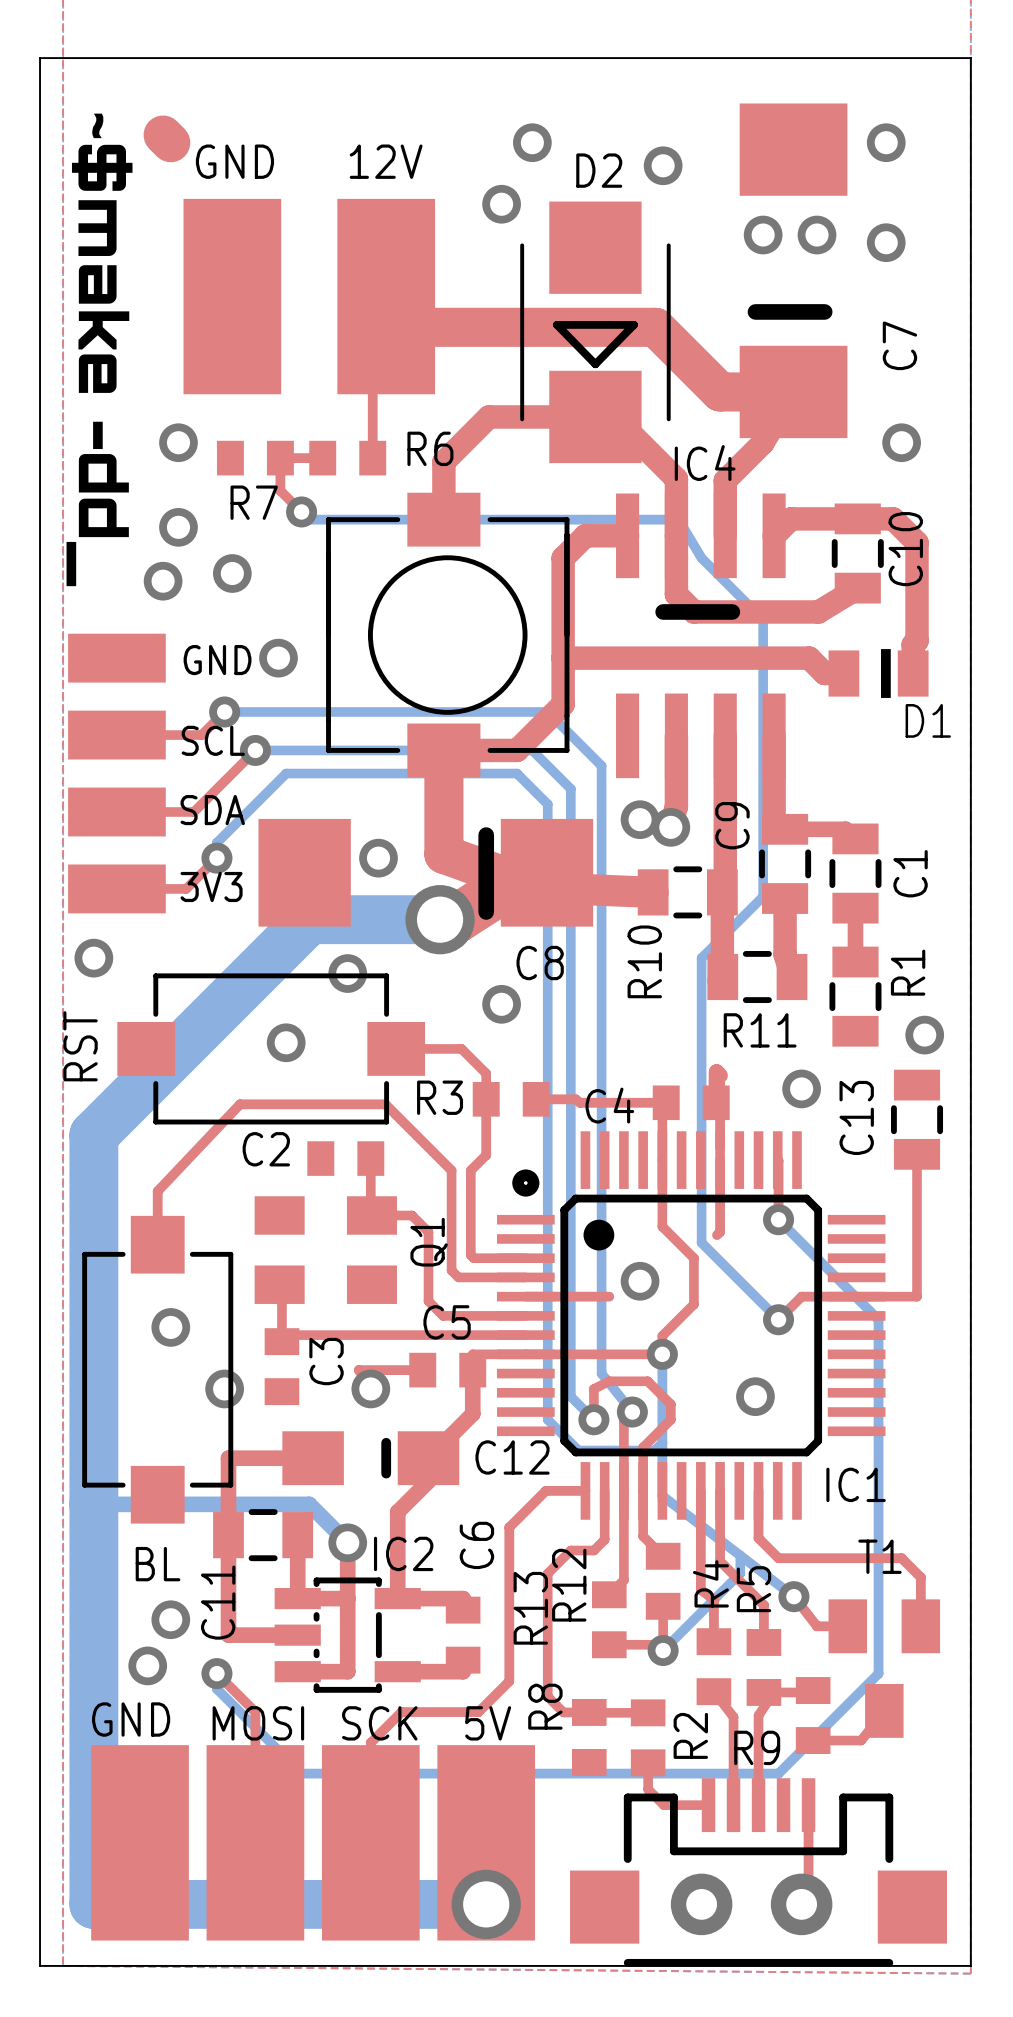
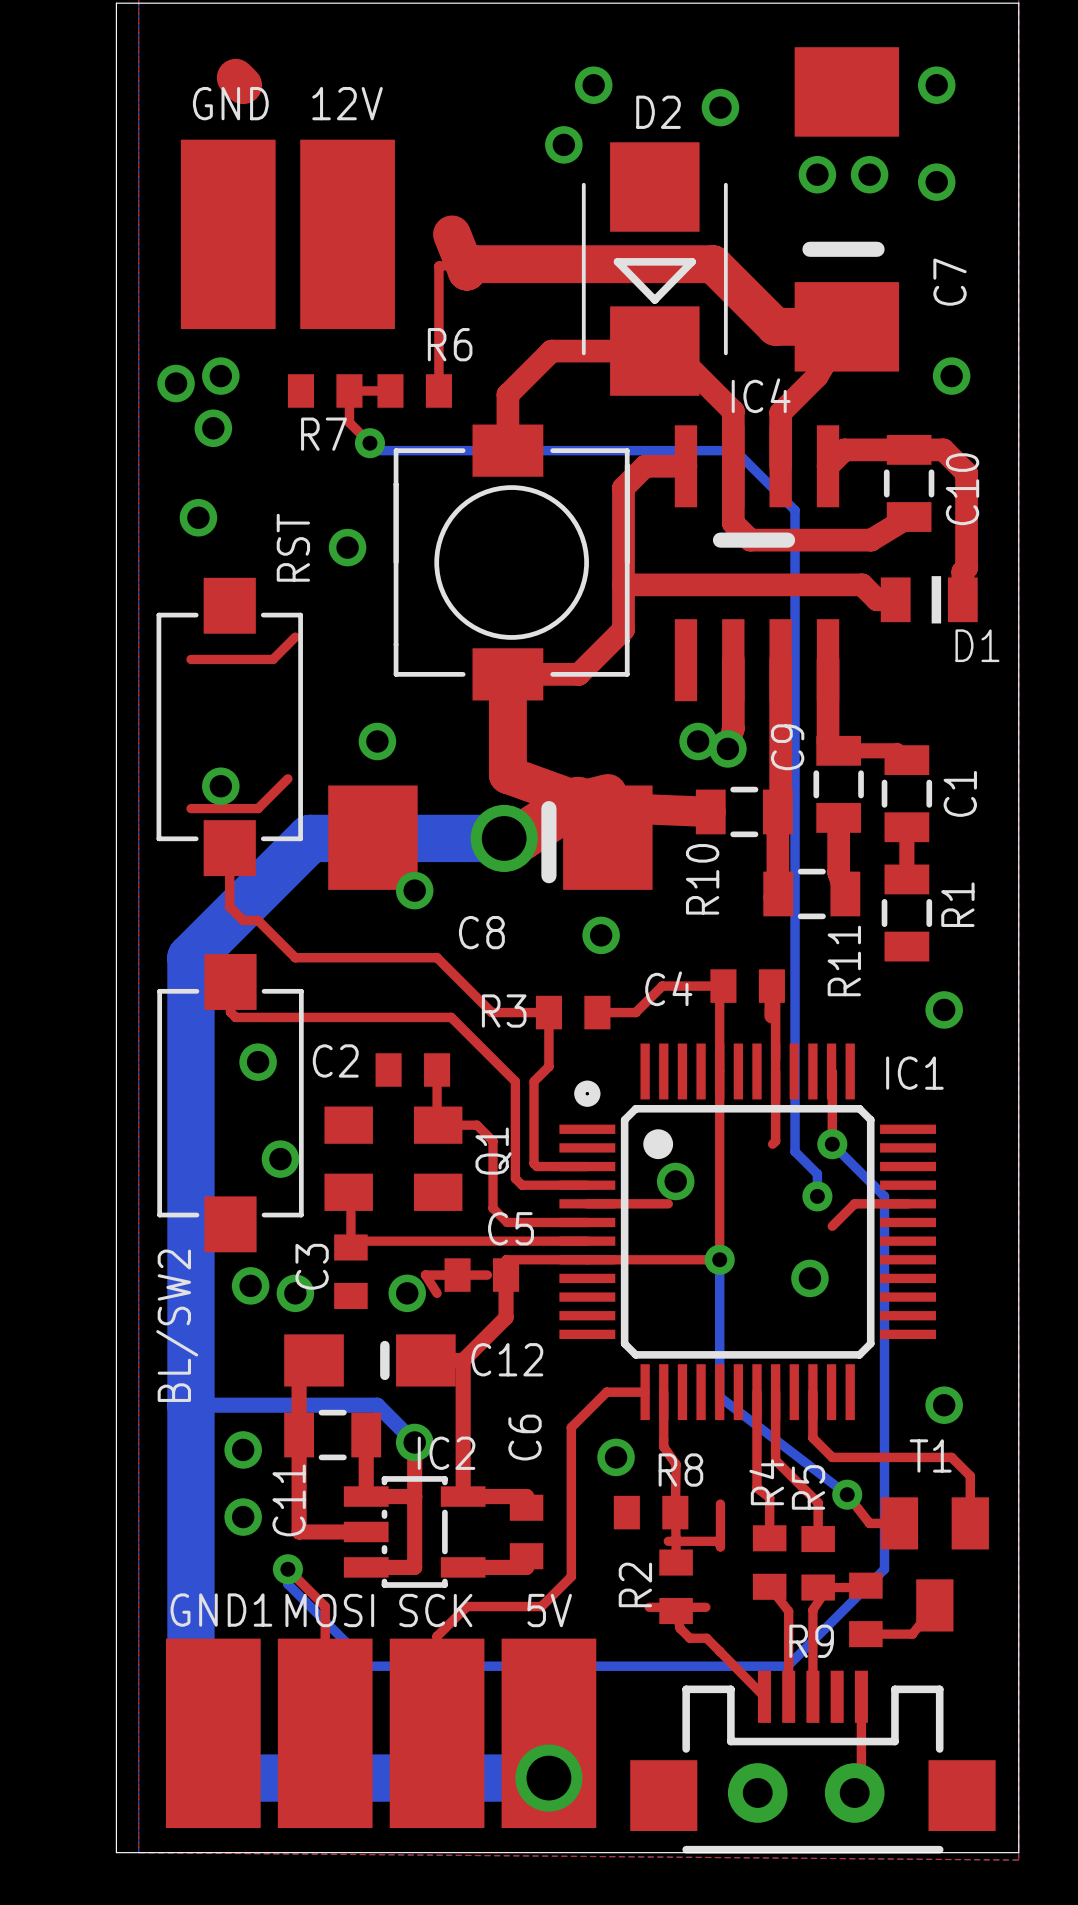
drawing: [66, 113, 133, 587] -> none
GND position: (232, 296) -> (228, 234)
12V position: (386, 296) -> (347, 234)
via position: (178, 442) -> (220, 376)
R6 name position: R6 (430, 448) -> R6 (450, 344)
via: none -> (176, 383)
via: none -> (213, 428)
bottom track: (678, 519) (701, 558) (763, 619) (763, 896) (701, 958) (701, 1242) (778, 1319) -> (735, 450) (795, 510) (795, 1151) (817, 1174) (817, 1196)
via: (178, 527) -> none
C10 name position: C10 (905, 549) -> C10 (962, 489)
via: (232, 573) -> none
via position: (163, 581) -> (198, 517)
part: (116, 658) -> none
via position: (278, 658) -> (347, 547)
text: GND (217, 660) -> none
bottom track: (224, 711) (547, 711) (601, 765) (601, 1373) (632, 1412) -> none
via: (224, 711) -> none
SCL: (116, 735) -> none
top track: (255, 750) (193, 811) (116, 811) -> none
bottom track: (255, 750) (532, 750) (570, 788) (570, 1396) (593, 1419) -> none
via: (255, 750) -> none
SDA: (116, 811) -> none
line: (486, 835) (486, 888) -> none
bottom track: (216, 858) (216, 842) (286, 773) (516, 773) (547, 804) (547, 1419) (578, 1450) (654, 1450) (662, 1442) -> none
via: (216, 858) -> none
via position: (378, 858) -> (377, 741)
via: none -> (220, 786)
C8 position: (425, 872) -> (490, 837)
3V3: (116, 888) -> none
line: none -> (548, 830) (548, 875)
bottom track: (309, 919) (93, 1135) (93, 1904) (486, 1904) -> (377, 838) (310, 838) (190, 957) (190, 1778) (548, 1778)
via: (93, 958) -> none
C8 name position: C8 (540, 963) -> C8 (481, 932)
R1 name position: R1 (908, 972) -> R1 (957, 904)
via position: (501, 1004) -> (601, 935)
R11 name rotation: 0° (760, 1030) -> 90° counterclockwise (844, 960)
via: (924, 1035) -> none
via: (286, 1042) -> none
RST rotation: 0° (271, 1048) -> 90° clockwise (229, 726)
RST position: (271, 1048) -> (229, 726)
top track: (396, 1048) (461, 1048) (486, 1073) (486, 1099) -> (229, 848) (229, 907) (243, 920) (258, 920) (295, 957) (437, 957) (491, 1012) (548, 1012)
via: (801, 1088) -> none
via: none -> (944, 1009)
top track: (575, 1099) (580, 1102) (666, 1102) (662, 1101) -> (635, 1012) (662, 986) (723, 986) (719, 999) (719, 1014)
C4 position: (691, 1102) -> (747, 986)
top track: (240, 1104) (157, 1191) (157, 1244) -> (310, 1017) (235, 1017) (230, 1012) (230, 981)
C13: (917, 1119) -> none
via: none -> (258, 1062)
top track: (917, 1154) (917, 1296) (856, 1296) -> none
BL/SW2: none -> (230, 1103)
bottom track: (778, 1219) (878, 1319) (878, 1673) (778, 1773) (732, 1773) -> (832, 1144) (884, 1196) (884, 1569) (787, 1666)
via position: (778, 1219) -> (832, 1144)
top track: (662, 1226) (693, 1258) (693, 1304) (662, 1335) -> (719, 1135) (719, 1241)
via: none -> (280, 1159)
via position: (640, 1281) -> (675, 1181)
via position: (778, 1319) -> (817, 1196)
via: (170, 1327) -> none
top track: (472, 1354) (472, 1413) (428, 1458) (428, 1481) (397, 1512) -> (535, 1259) (506, 1259) (506, 1317) (463, 1360)
C3 name position: C3 (326, 1361) -> C3 (312, 1266)
BL: (157, 1369) -> none
C5 position: (447, 1370) -> (481, 1275)
via: none -> (250, 1285)
via position: (370, 1388) -> (407, 1293)
via position: (755, 1396) -> (809, 1278)
top track: (632, 1412) (623, 1420) (623, 1580) (609, 1594) -> none
via: (632, 1412) -> none
top track: (593, 1419) (593, 1388) (609, 1381) (647, 1381) (670, 1404) (670, 1419) (643, 1447) (643, 1536) (663, 1556) -> none
via: (593, 1419) -> none
line: (386, 1442) (386, 1473) -> (384, 1345) (384, 1375)
top track: (243, 1458) (313, 1458) -> none
C12 position: (370, 1458) -> (369, 1360)
top track: none -> (463, 1360) (463, 1412)
IC1 name position: IC1 (856, 1484) -> IC1 (914, 1073)
via: none -> (944, 1405)
top track: (604, 1539) (593, 1550) (570, 1550) (547, 1573) (547, 1696) (563, 1712) (589, 1712) -> (663, 1439) (663, 1446) (676, 1464) (676, 1562)
C6 name position: C6 (476, 1545) -> C6 (525, 1437)
via: none -> (243, 1449)
IC2 name position: IC2 (403, 1553) -> IC2 (446, 1453)
bottom track: (740, 1555) (740, 1573) (663, 1650) -> none
via: none -> (616, 1457)
R12: (663, 1581) -> none
R13: (609, 1619) -> none
via: (663, 1650) -> none
via: (147, 1665) -> none
GND1 name: none -> GND1 (221, 1610)
text: GND (131, 1719) -> none
MOSI name position: MOSI (258, 1723) -> MOSI (329, 1610)
SCK name position: SCK (379, 1723) -> SCK (435, 1610)
5V name position: 5V (488, 1723) -> 5V (549, 1610)
R2 name position: R2 (690, 1735) -> R2 (635, 1584)
R8 rotation: 0° (589, 1737) -> 90° clockwise (651, 1512)
R8 position: (589, 1737) -> (651, 1512)
R2 position: (648, 1737) -> (676, 1586)
top track: (648, 1762) (648, 1789) (663, 1805) (708, 1805) -> (676, 1611) (680, 1628) (689, 1638) (706, 1638) (764, 1696)
via position: (486, 1904) -> (548, 1778)

